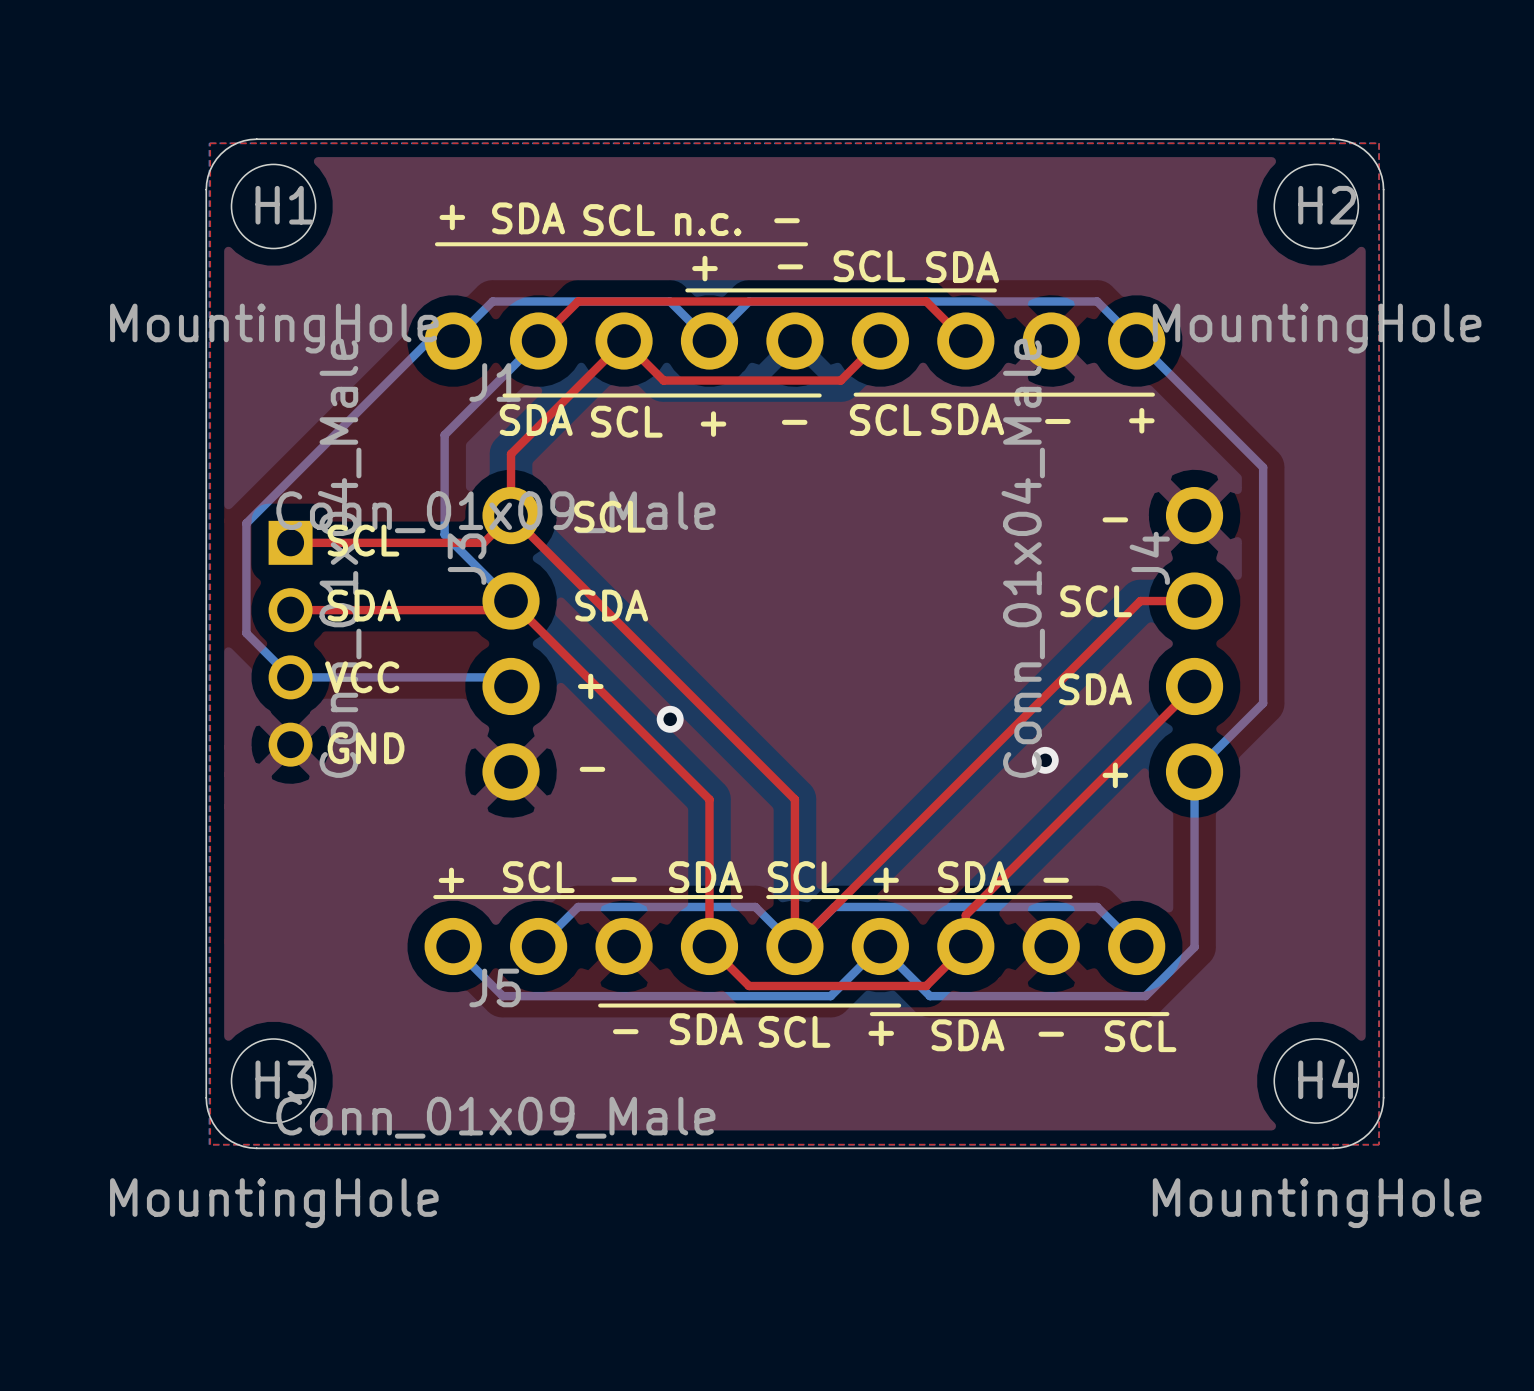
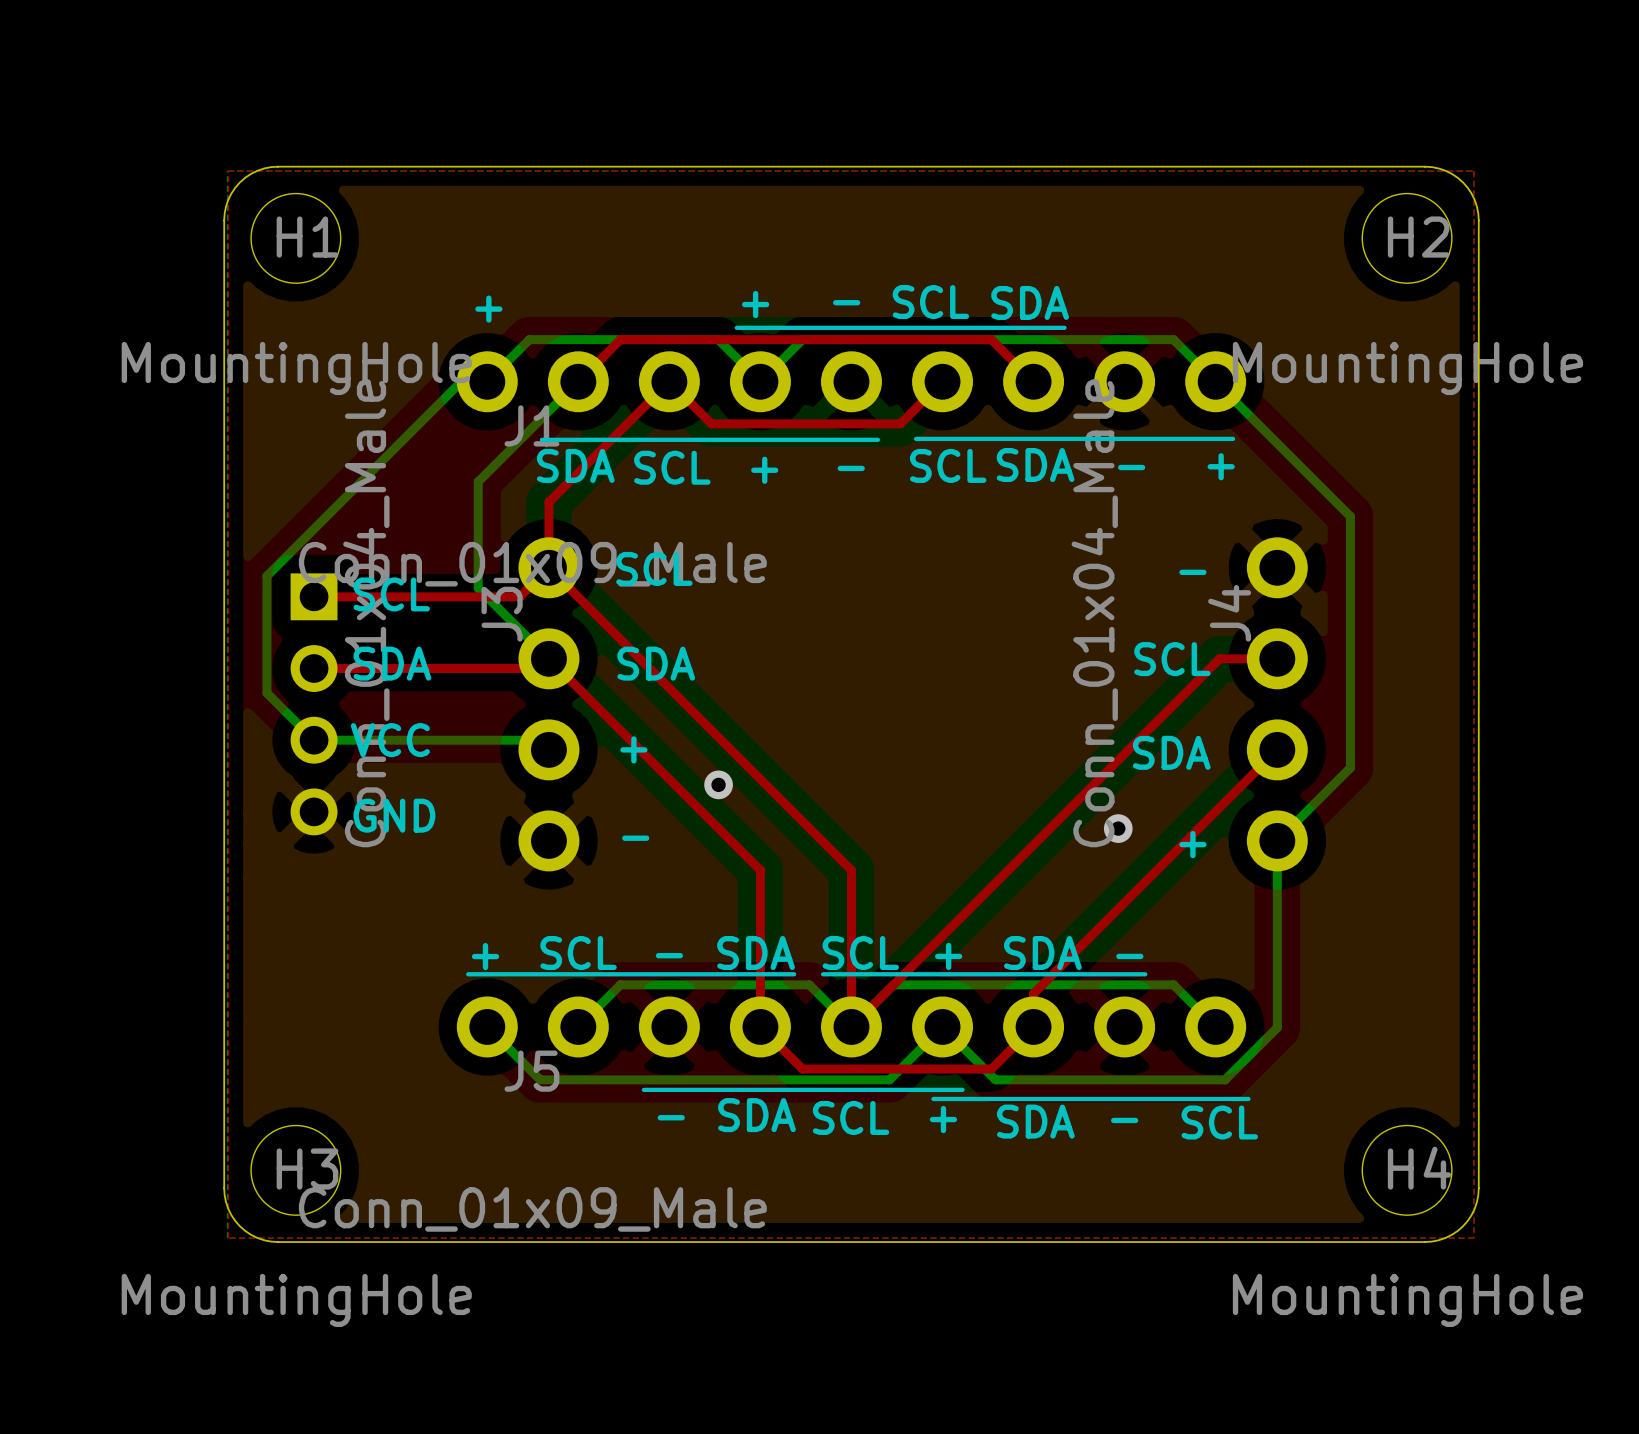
text position: + (452, 217) -> + (488, 309)
text: SDA (528, 218) -> none
text: SCL (619, 220) -> none
text: - (786, 220) -> none
text: n.c. (708, 224) -> none
line: (436, 244) (806, 244) -> none

